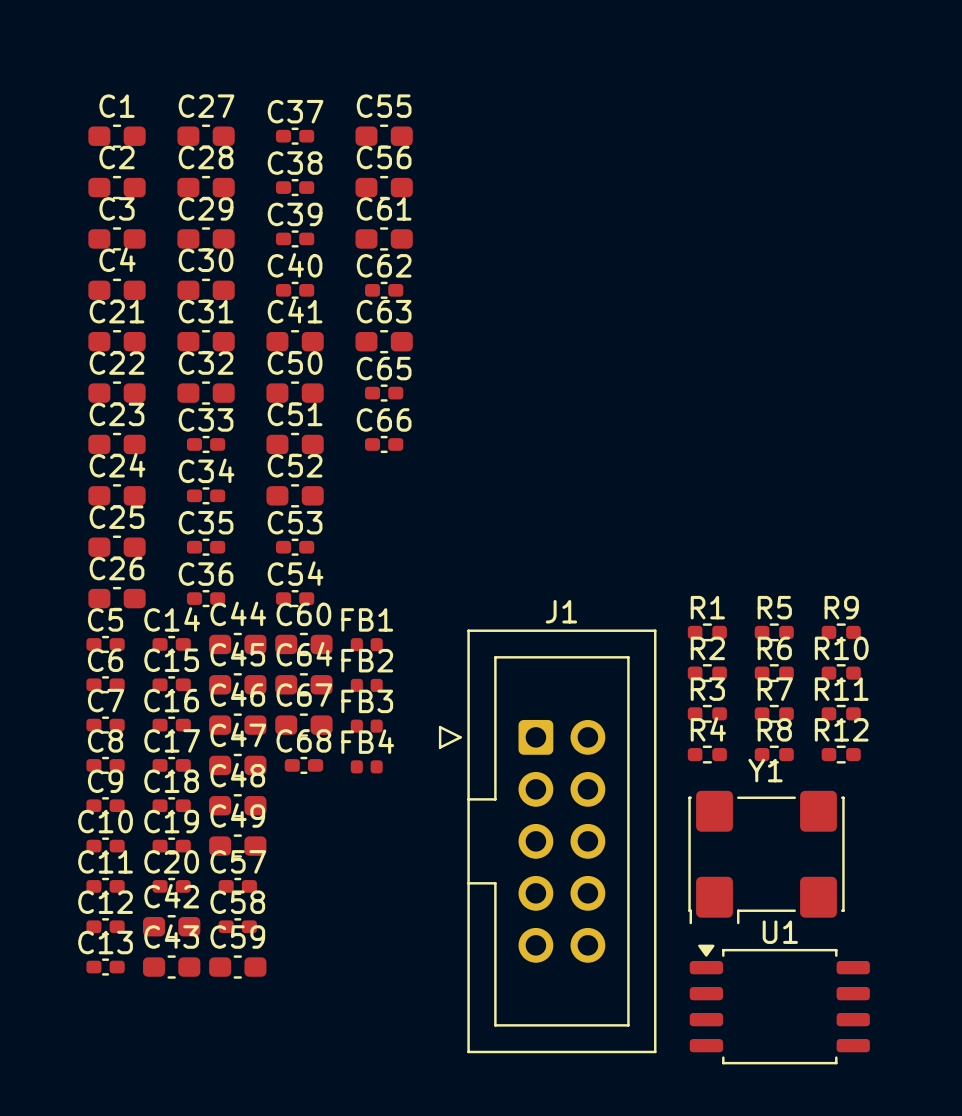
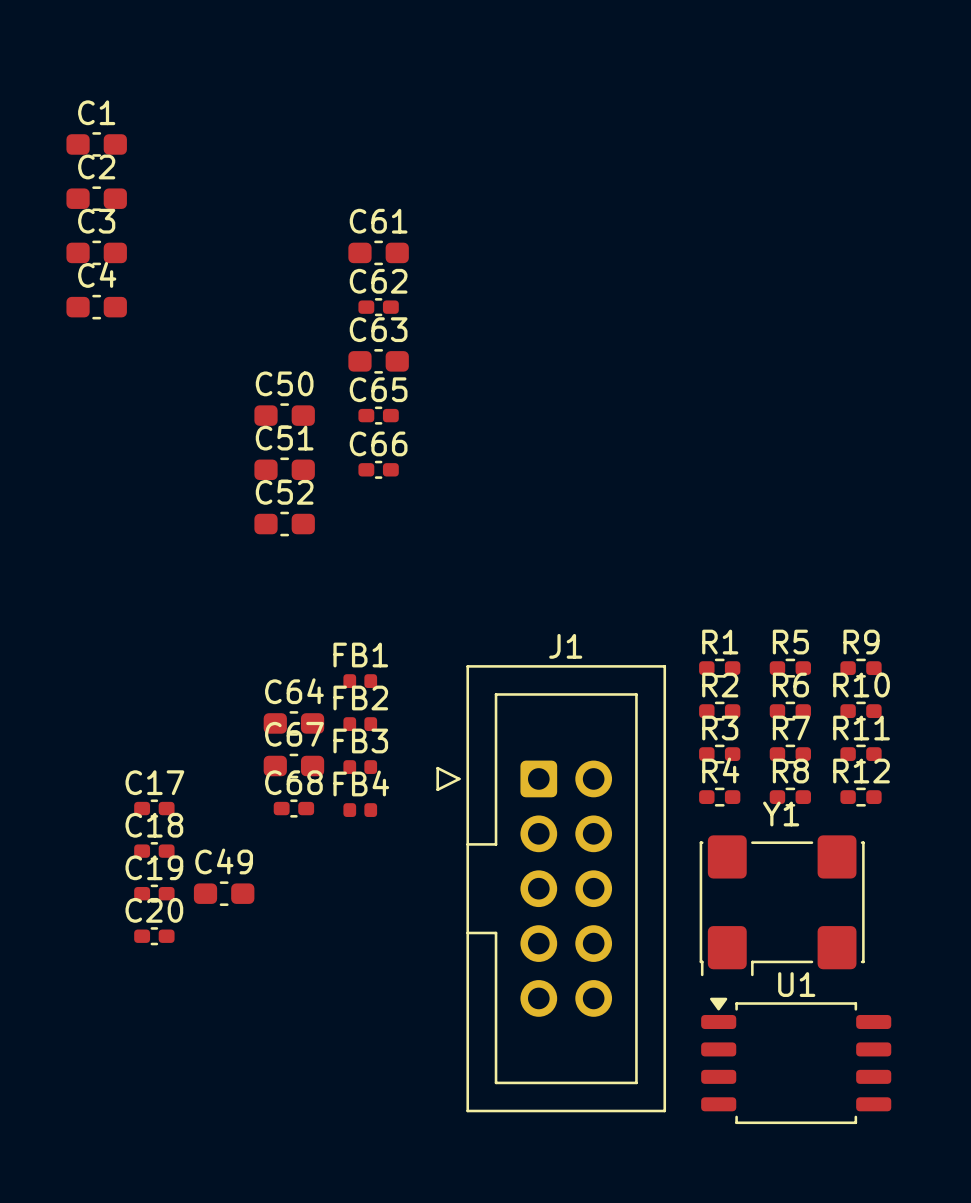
C27: (206, 136) -> none
C37: (295, 136) -> none
C55: (384, 136) -> none
C28: (206, 187) -> none
C38: (295, 187) -> none
C56: (384, 187) -> none
C29: (206, 238) -> none
C39: (295, 238) -> none
C30: (206, 290) -> none
C40: (295, 290) -> none
C21: (117, 341) -> none
C31: (206, 341) -> none
C41: (295, 341) -> none
C22: (117, 393) -> none
C32: (206, 393) -> none
C23: (117, 444) -> none
C33: (206, 444) -> none
C24: (117, 495) -> none
C34: (206, 495) -> none
C25: (117, 547) -> none
C35: (206, 547) -> none
C53: (295, 547) -> none
C26: (117, 598) -> none
C36: (206, 598) -> none
C54: (295, 598) -> none
C5: (105, 644) -> none
C14: (171, 644) -> none
C44: (237, 644) -> none
C60: (303, 644) -> none
C6: (105, 684) -> none
C15: (171, 684) -> none
C45: (237, 684) -> none
C7: (105, 725) -> none
C16: (171, 725) -> none
C46: (237, 725) -> none
C8: (105, 765) -> none
C47: (237, 765) -> none
C9: (105, 805) -> none
C48: (237, 805) -> none
C10: (105, 846) -> none
C11: (105, 886) -> none
C57: (237, 886) -> none
C12: (105, 926) -> none
C42: (171, 926) -> none
C58: (237, 926) -> none
C13: (105, 967) -> none
C43: (171, 967) -> none
C59: (237, 967) -> none

